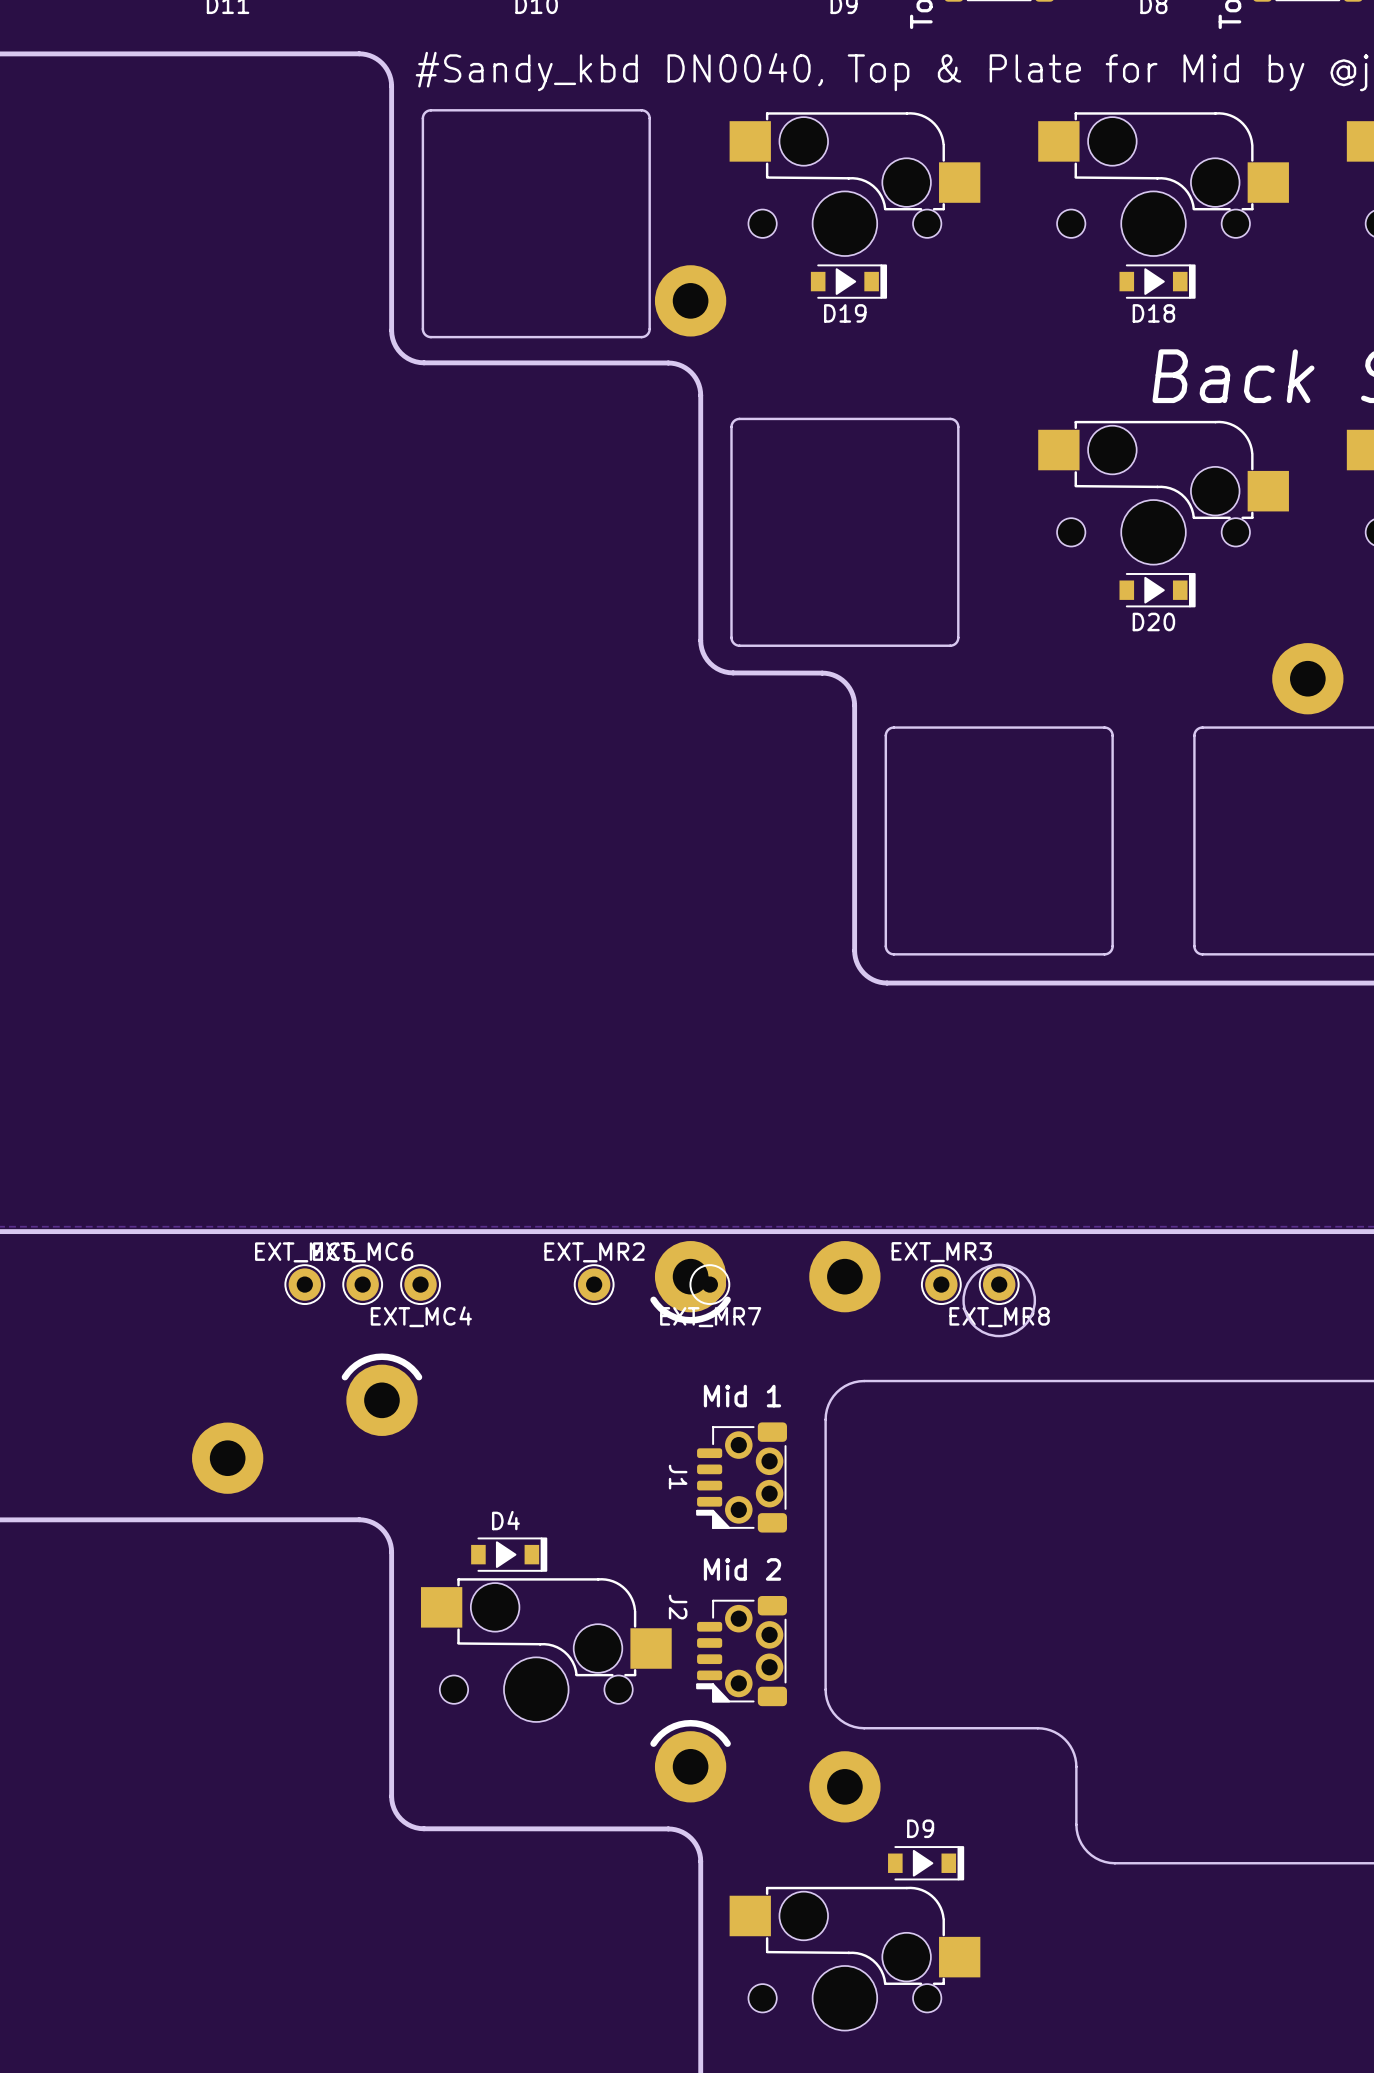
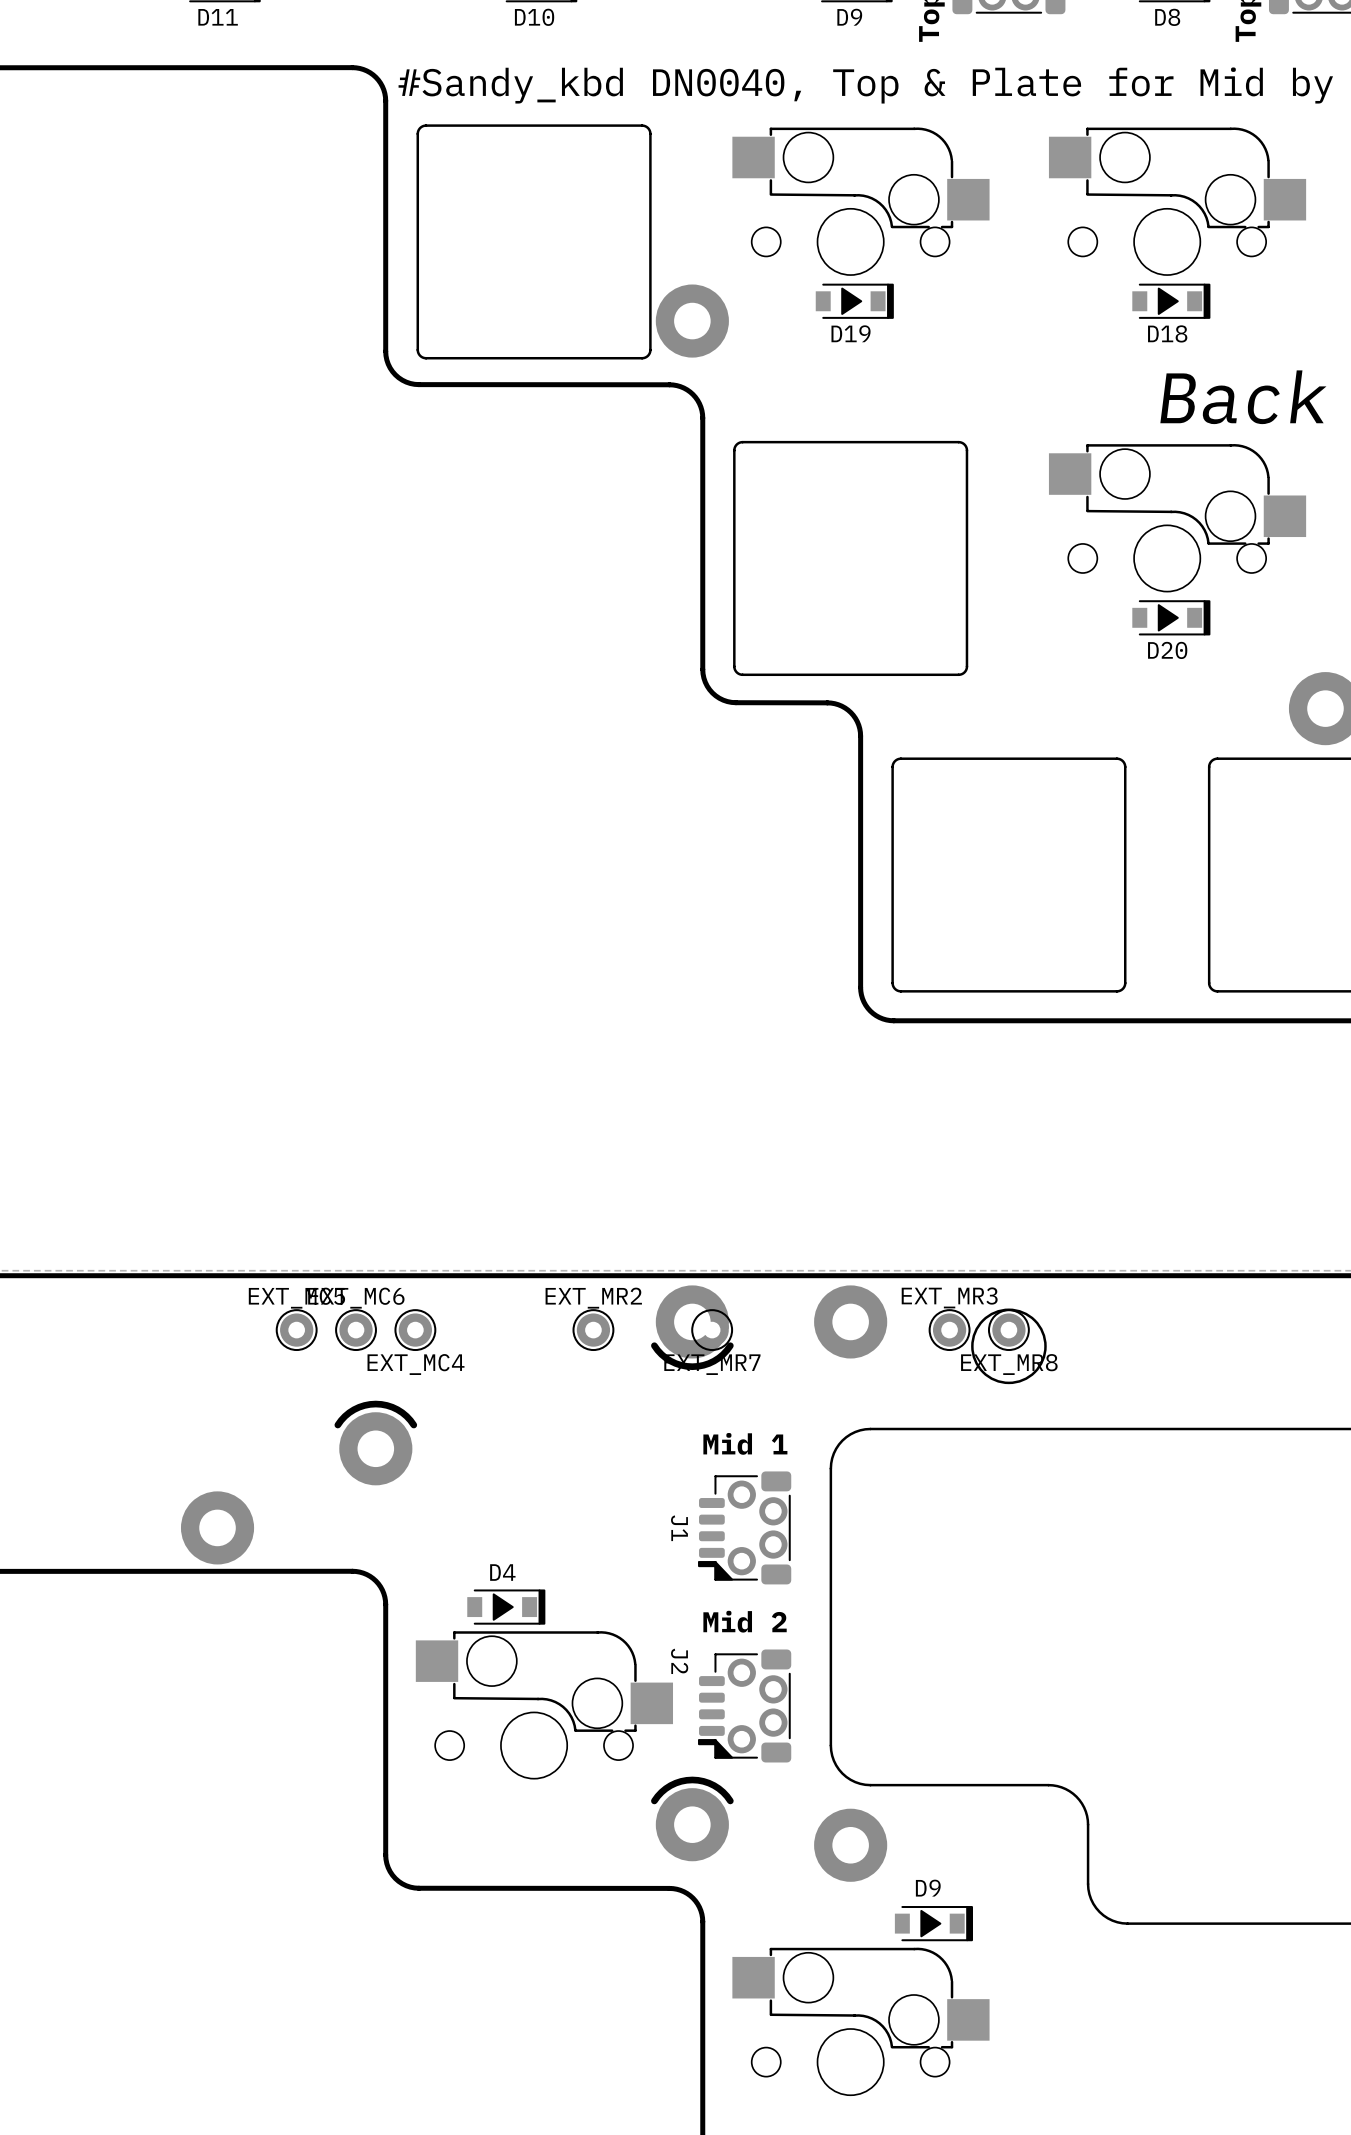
part position: (227, 1458) -> (217, 1527)

